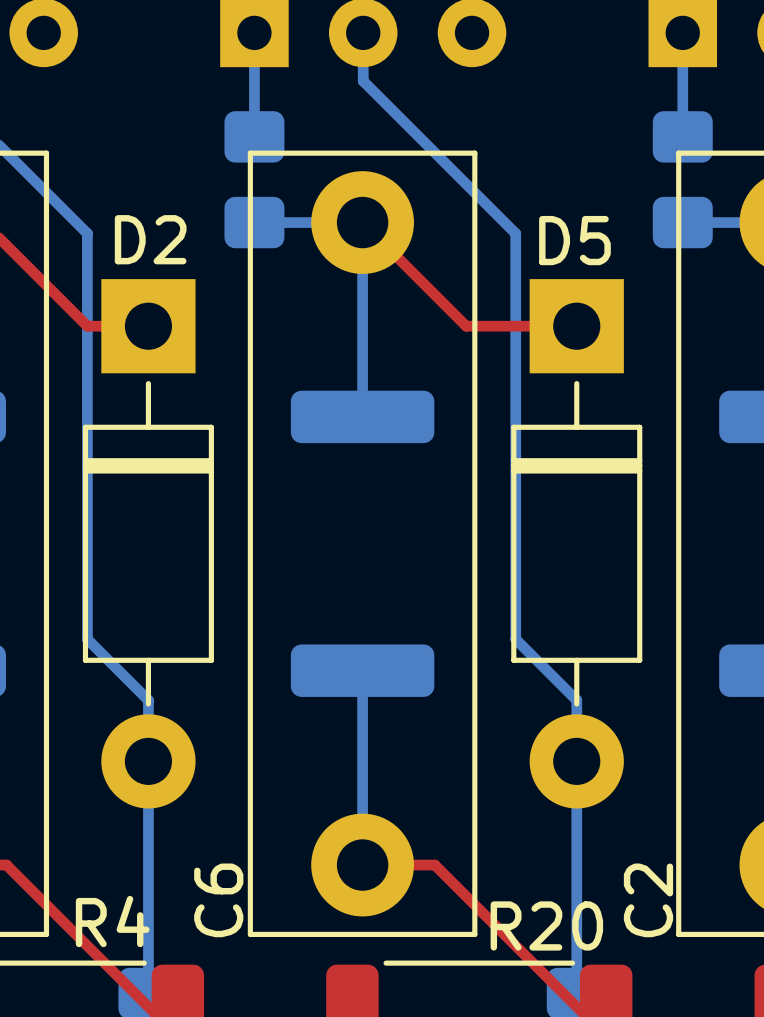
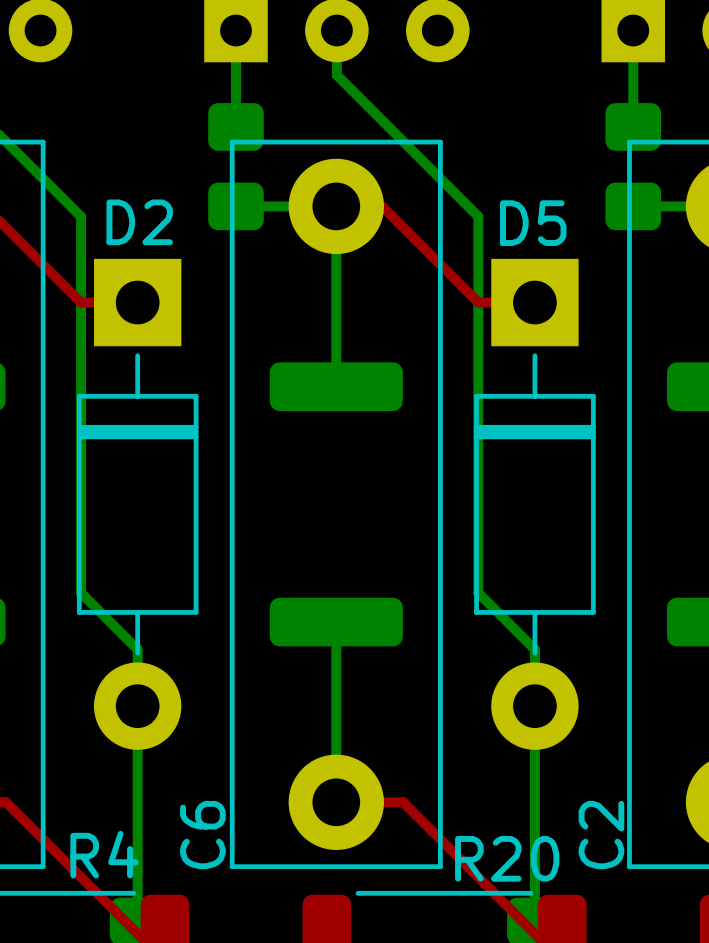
top track: (362, 222) (466, 326) (515, 326) -> (336, 206) (382, 206) (478, 302)

